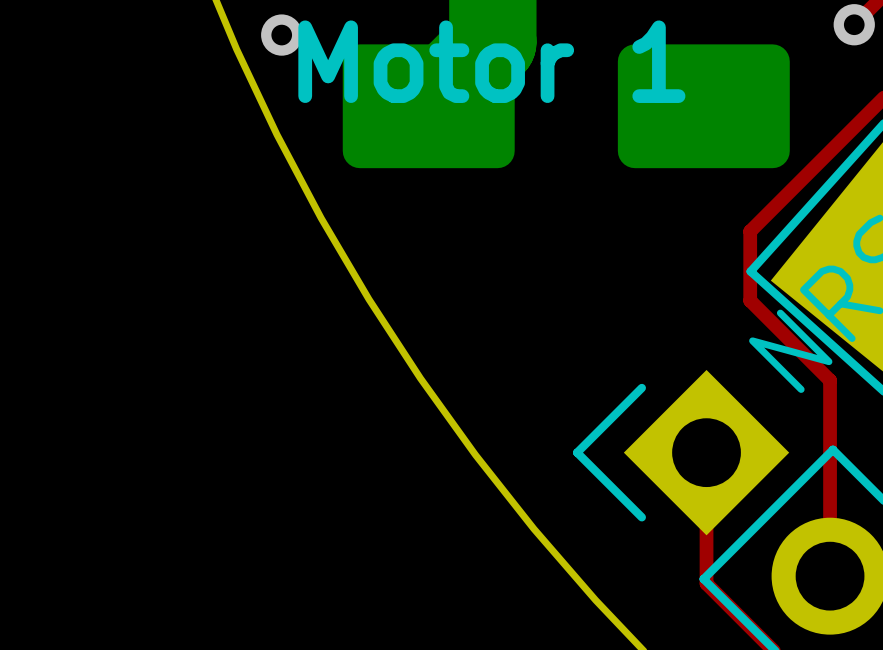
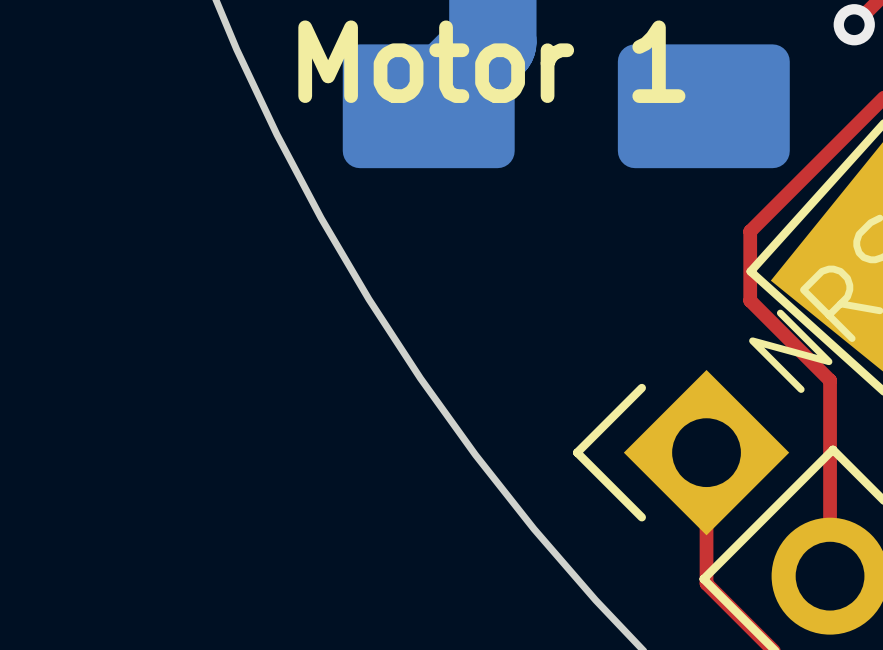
via: (281, 35) -> none

